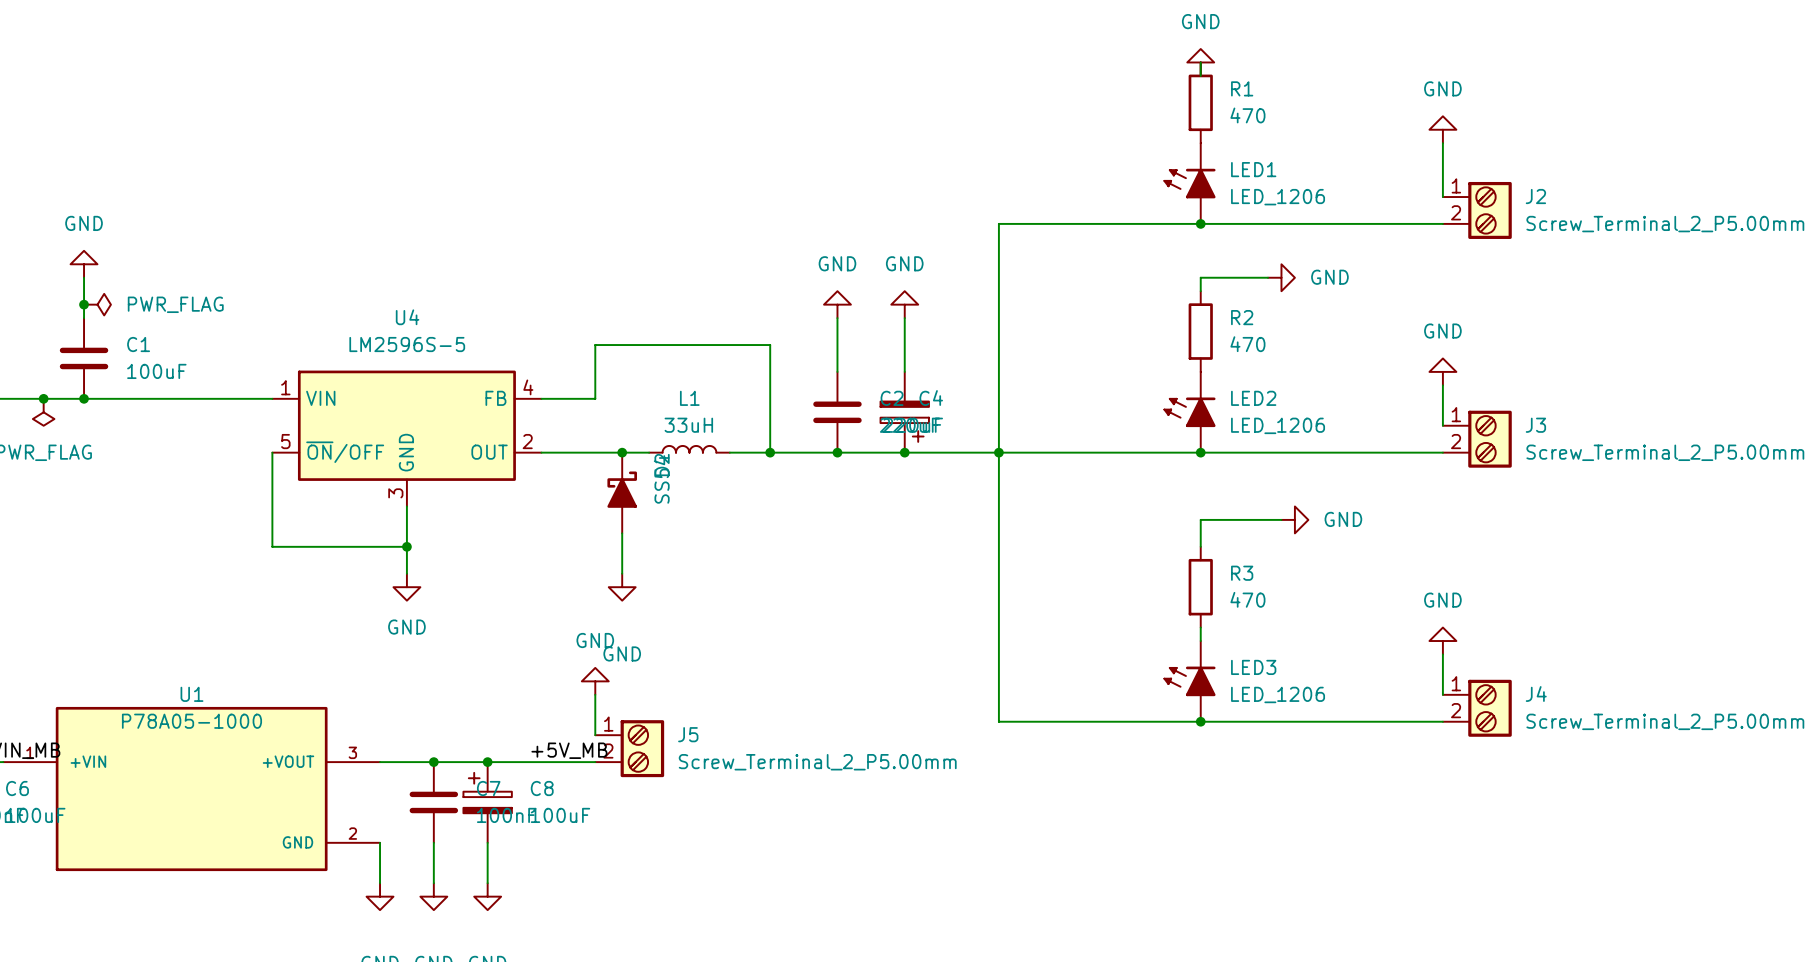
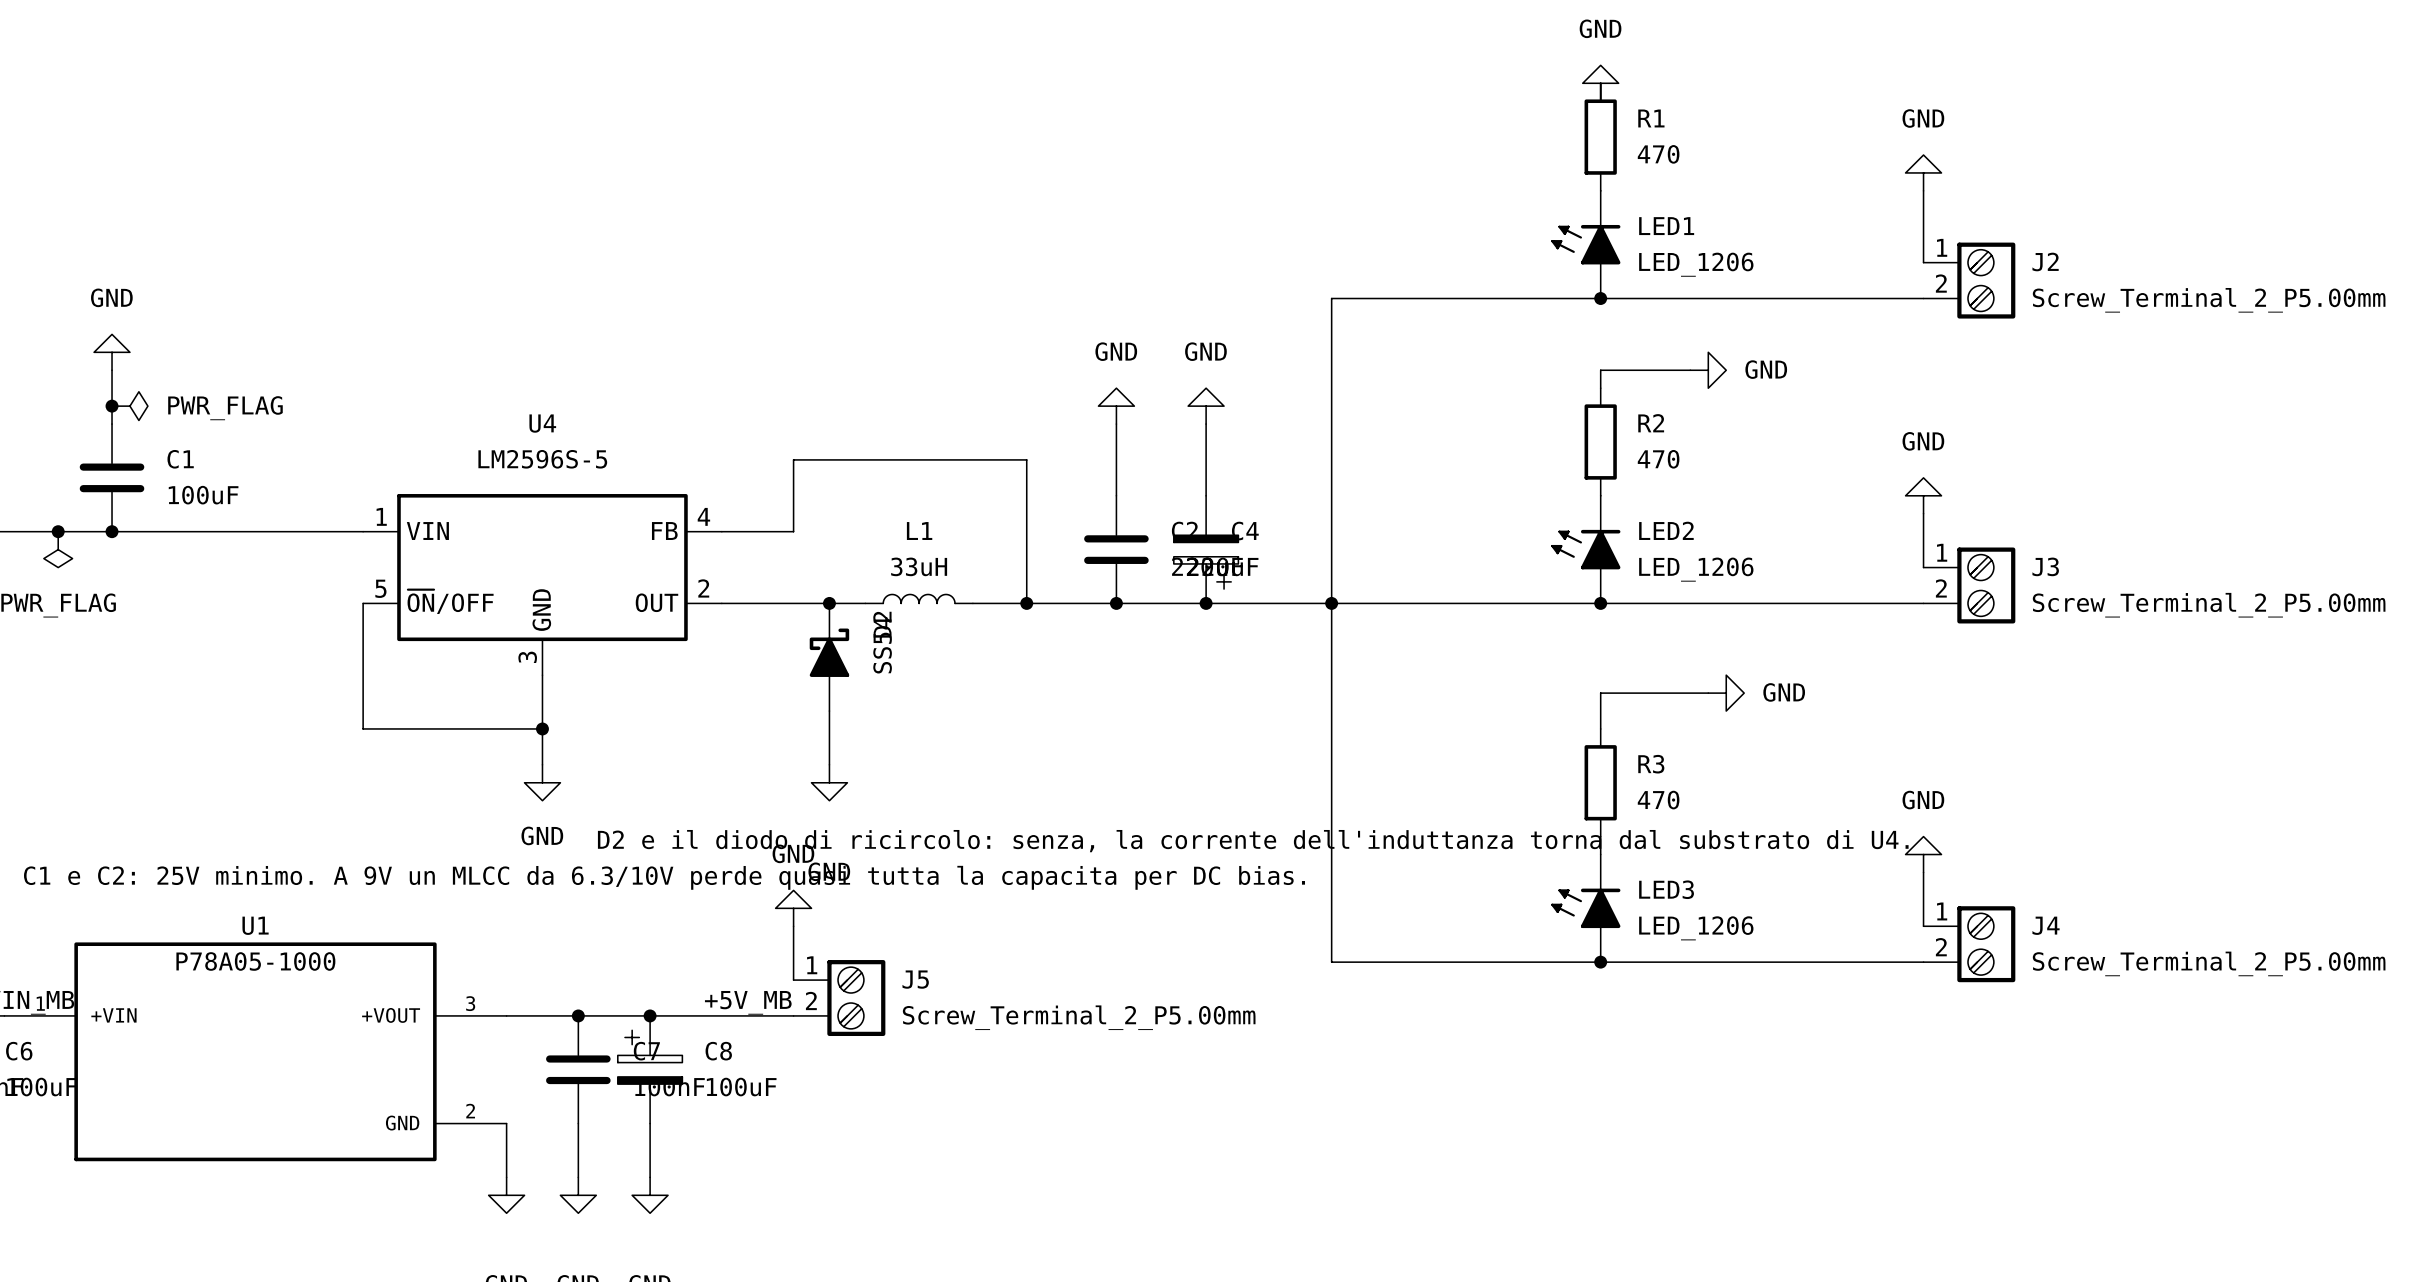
text: none -> D2 e il diodo di ricircolo: senza, la corrente dell'induttanza torna dal substrato di U4. (1253, 841)
text: none -> C1 e C2: 25V minimo. A 9V un MLCC da 6.3/10V perde quasi tutta la capacita per DC bias. (664, 877)

